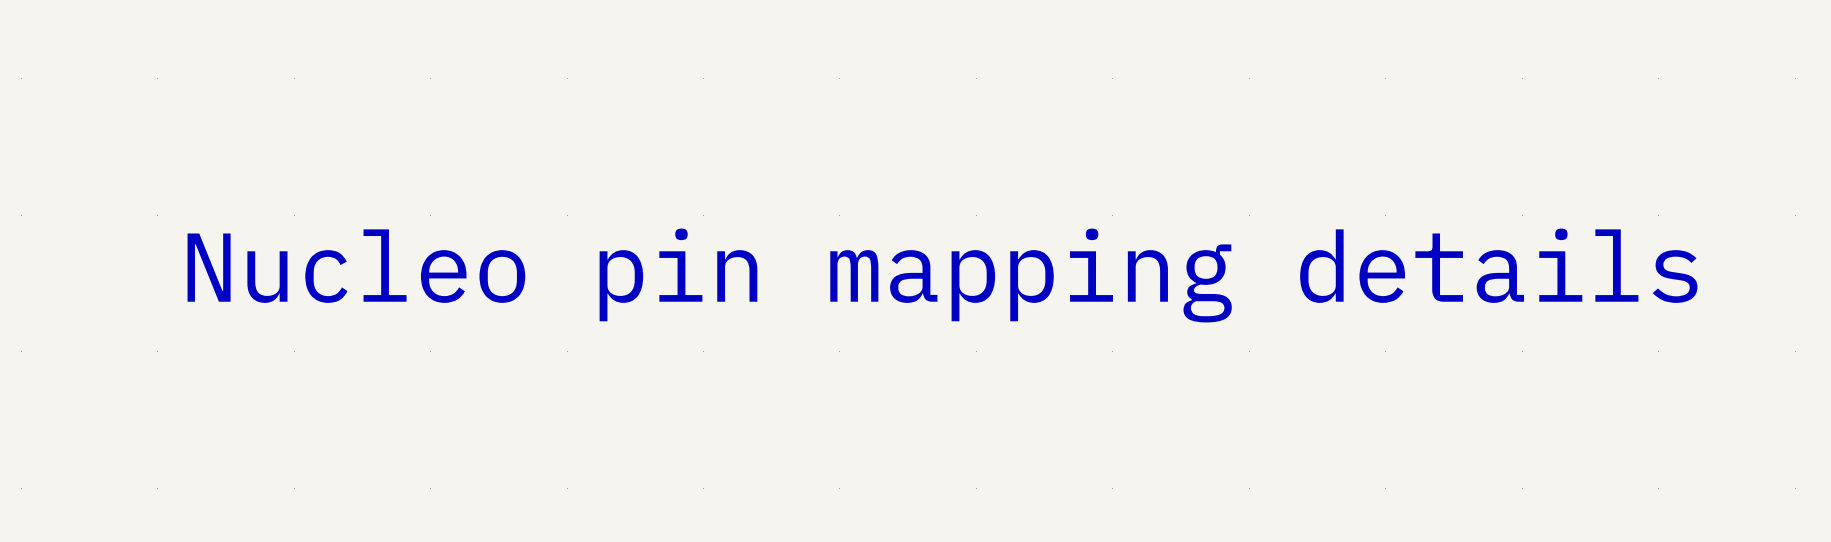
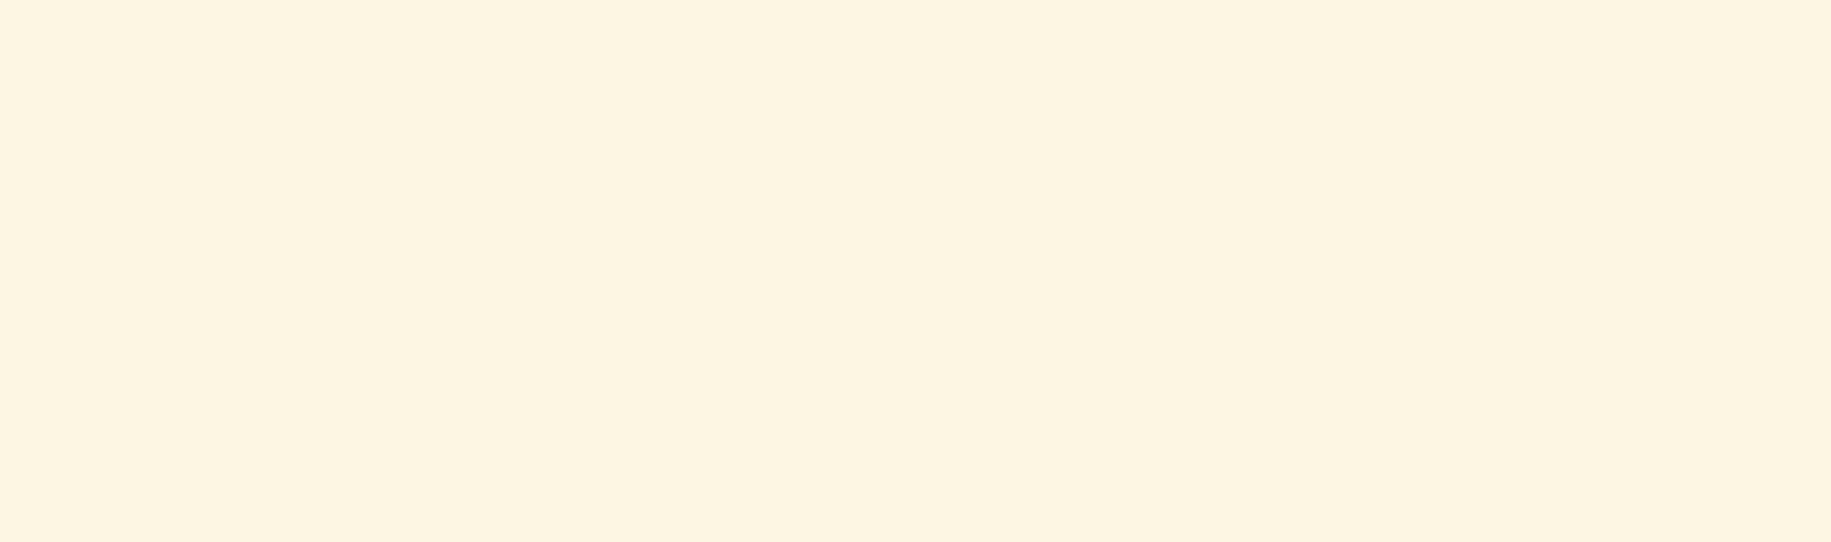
text: Nucleo pin mapping details (942, 275) -> none

